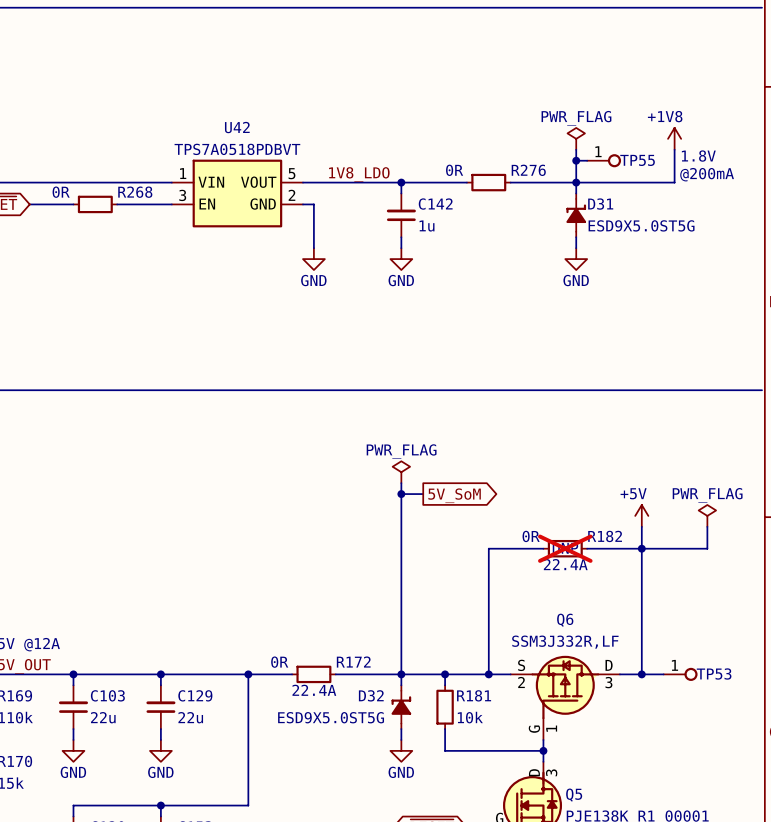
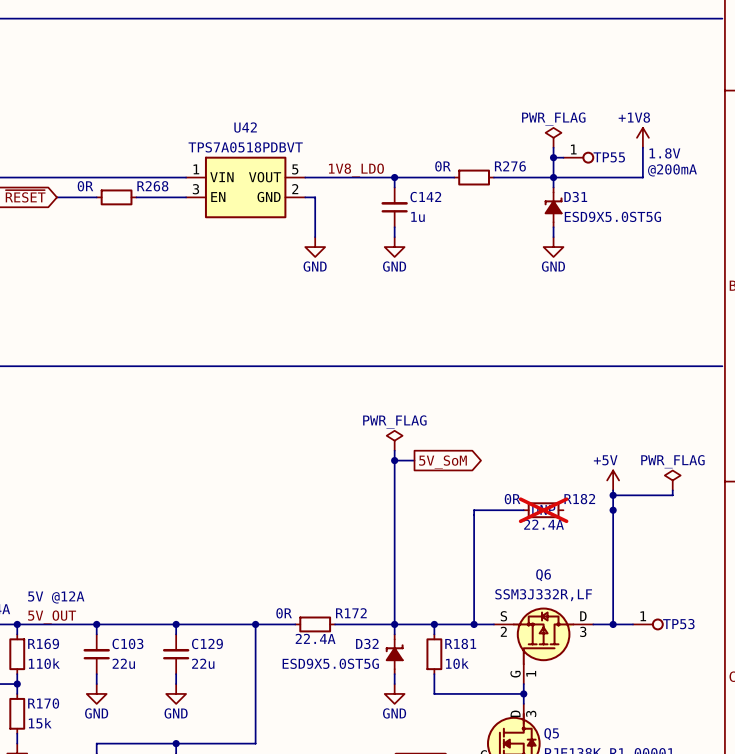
junction: none -> (613, 495)
wire: (707, 532) (707, 548) (587, 548) -> (672, 495) (613, 495)

